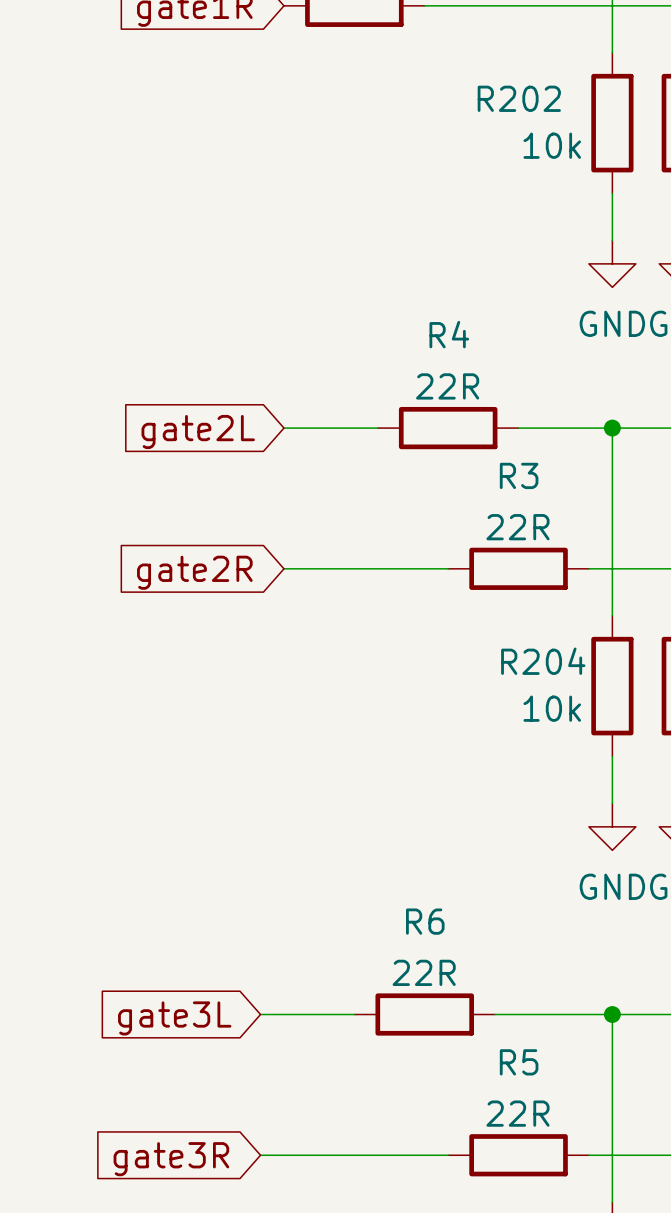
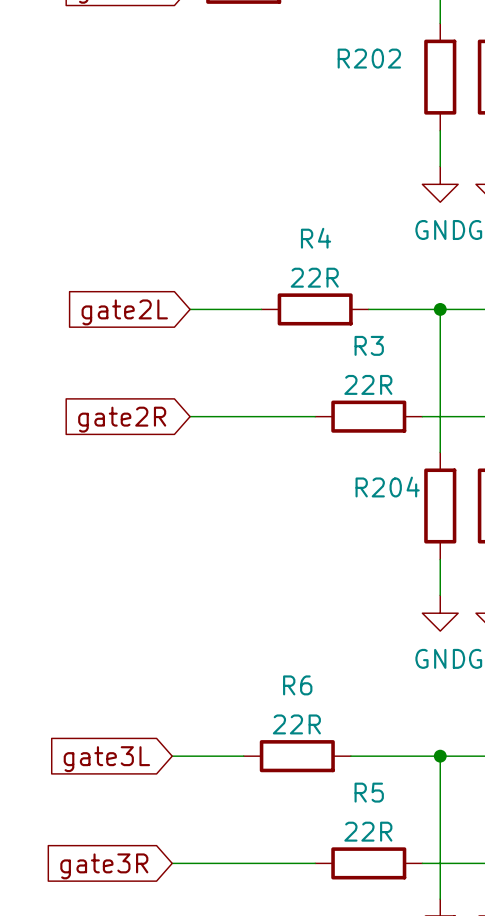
R202 value: 10k (552, 145) -> none
R204 value: 10k (552, 708) -> none

